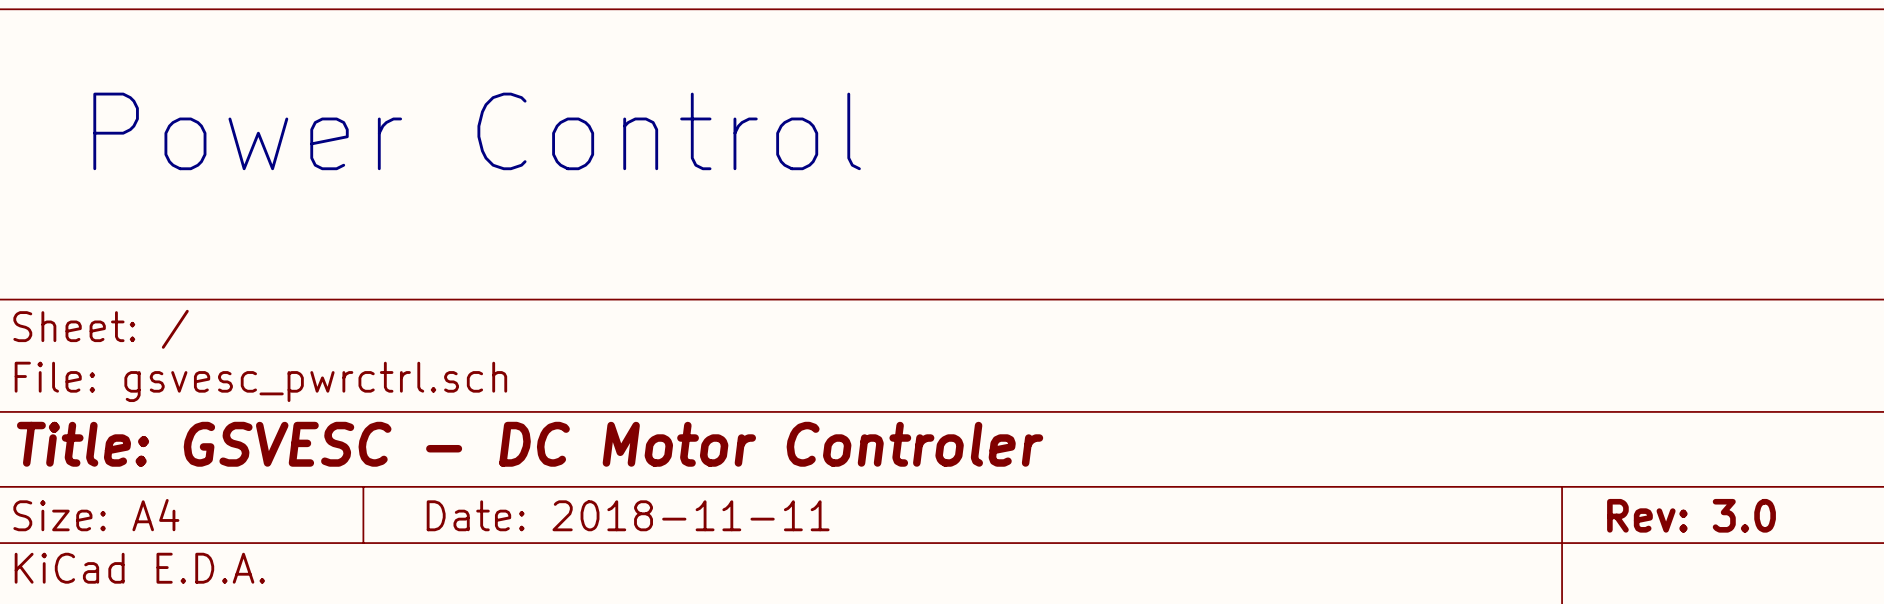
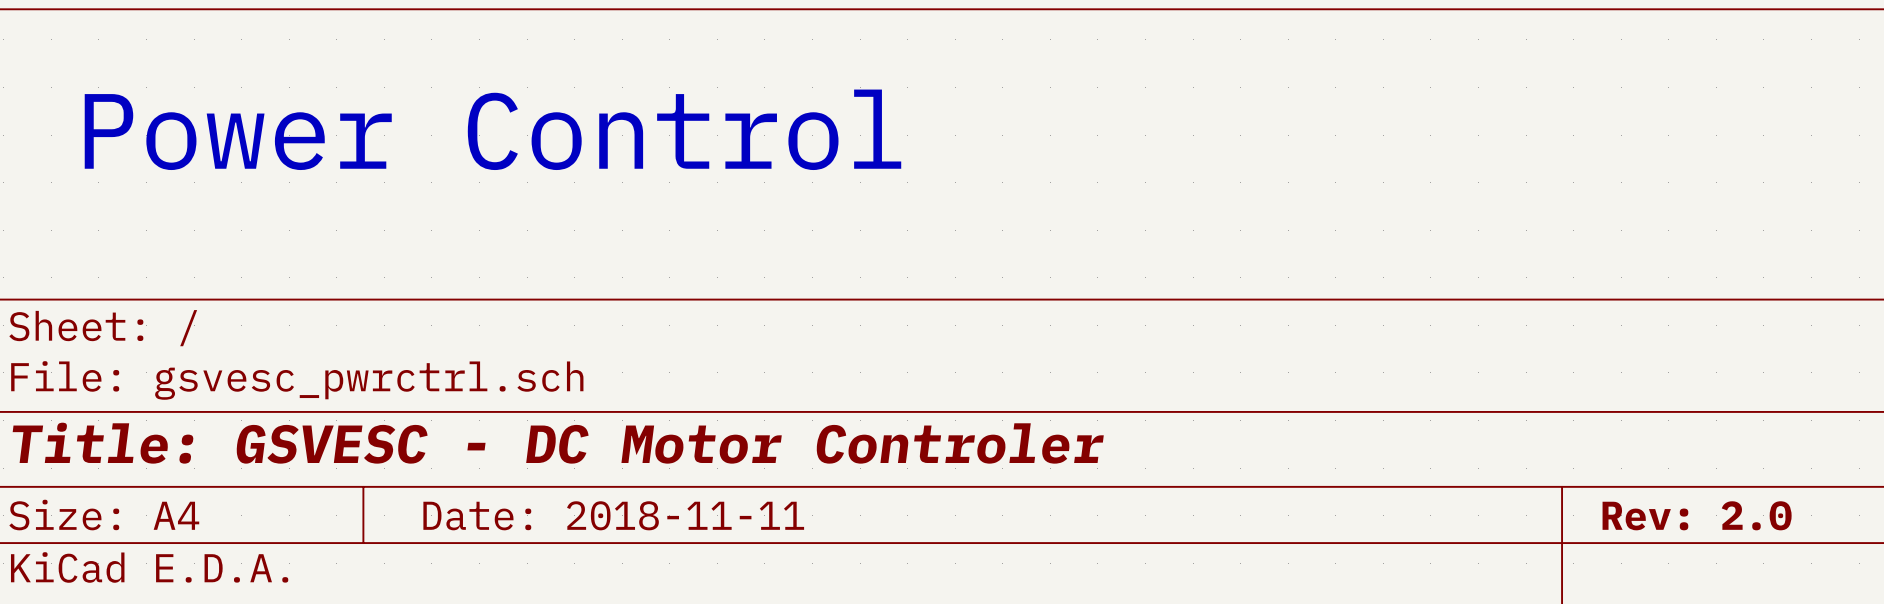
title block: Rev: 3.0 (1691, 515) -> Rev: 2.0 (1697, 515)

